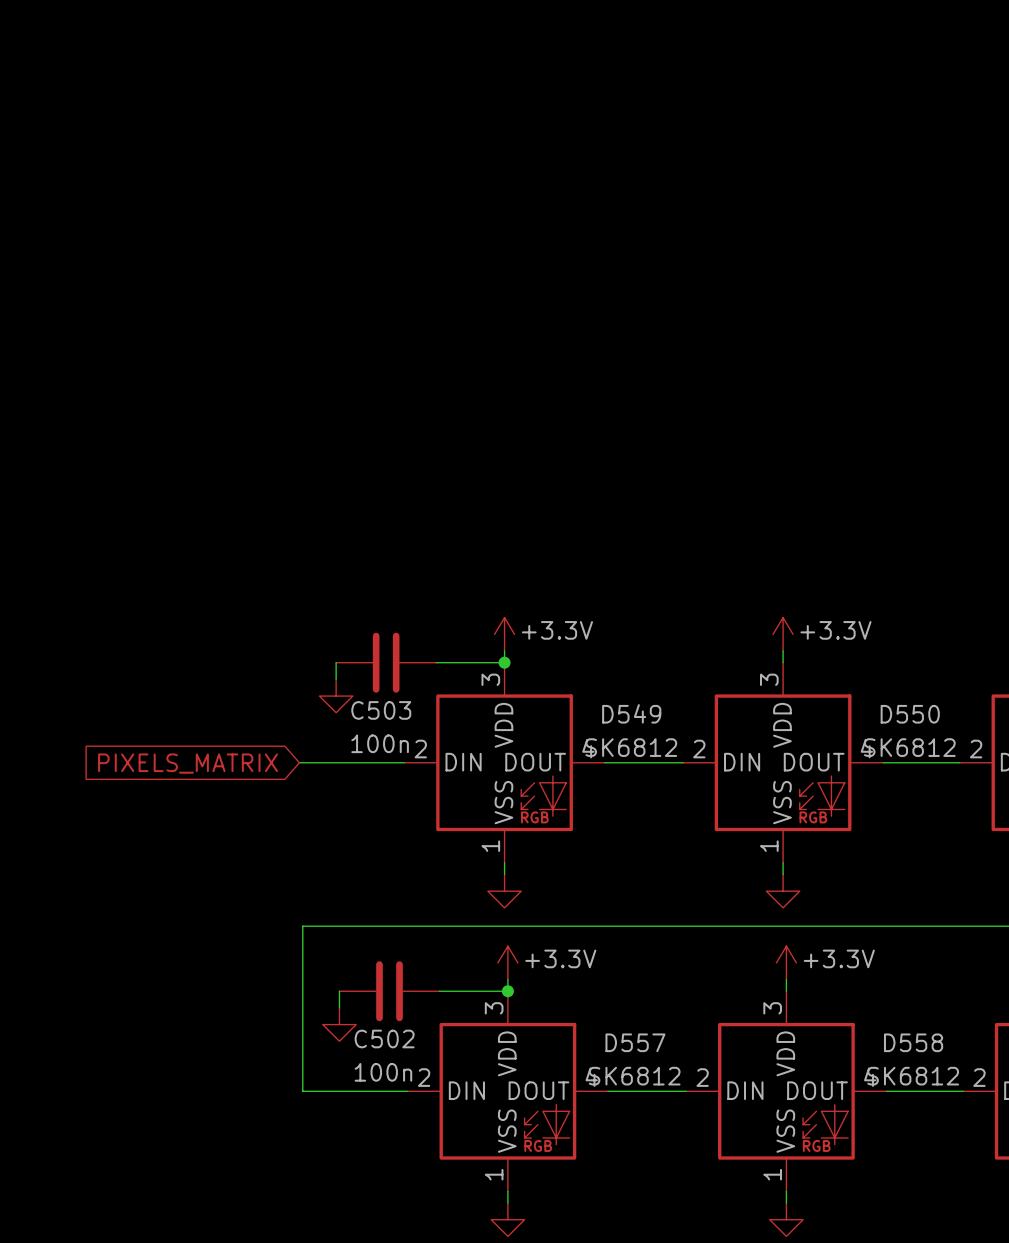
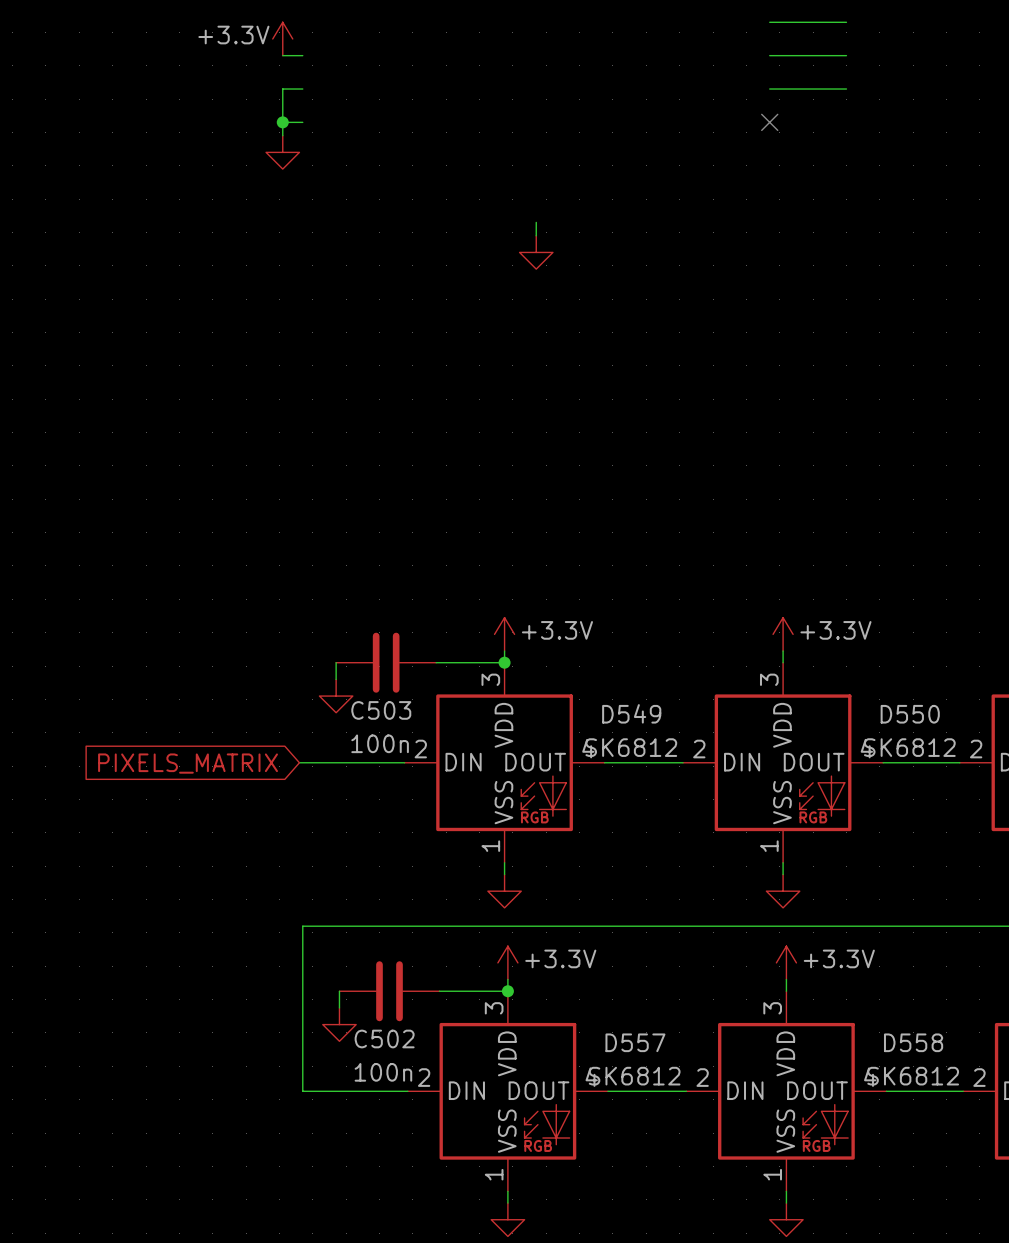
wire: none -> (769, 22) (846, 22)
power symbol: none -> +3.3V (282, 38)
wire: none -> (282, 55) (302, 55)
wire: none -> (769, 55) (846, 55)
wire: none -> (302, 89) (282, 89) (282, 135)
wire: none -> (769, 89) (846, 89)
wire: none -> (282, 122) (302, 122)
junction: none -> (282, 122)
no-connect mark: none -> (769, 122)
power symbol: none -> (282, 152)
wire: none -> (536, 222) (536, 235)
power symbol: none -> (536, 252)

